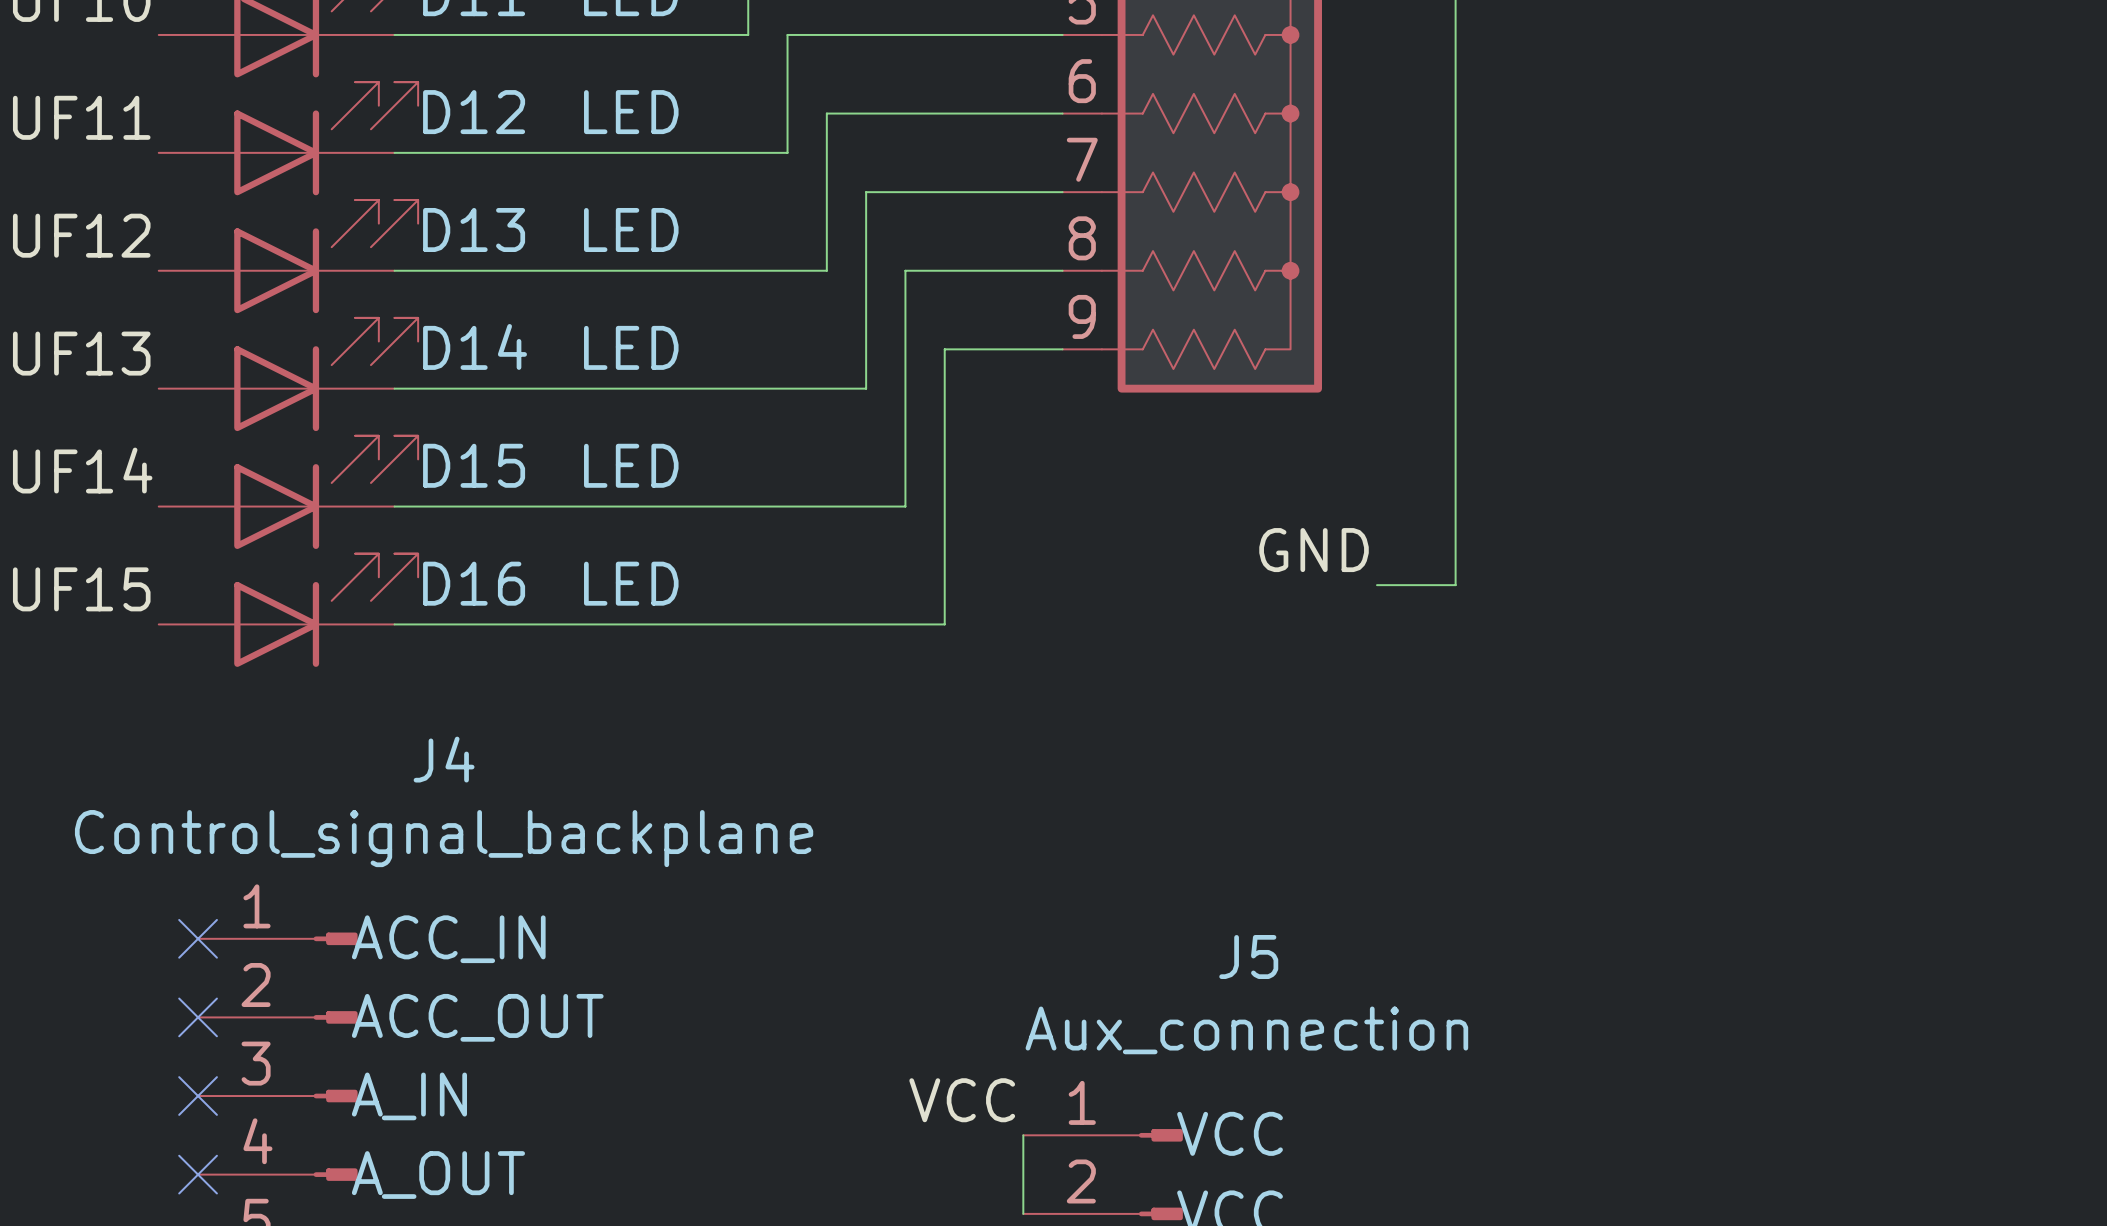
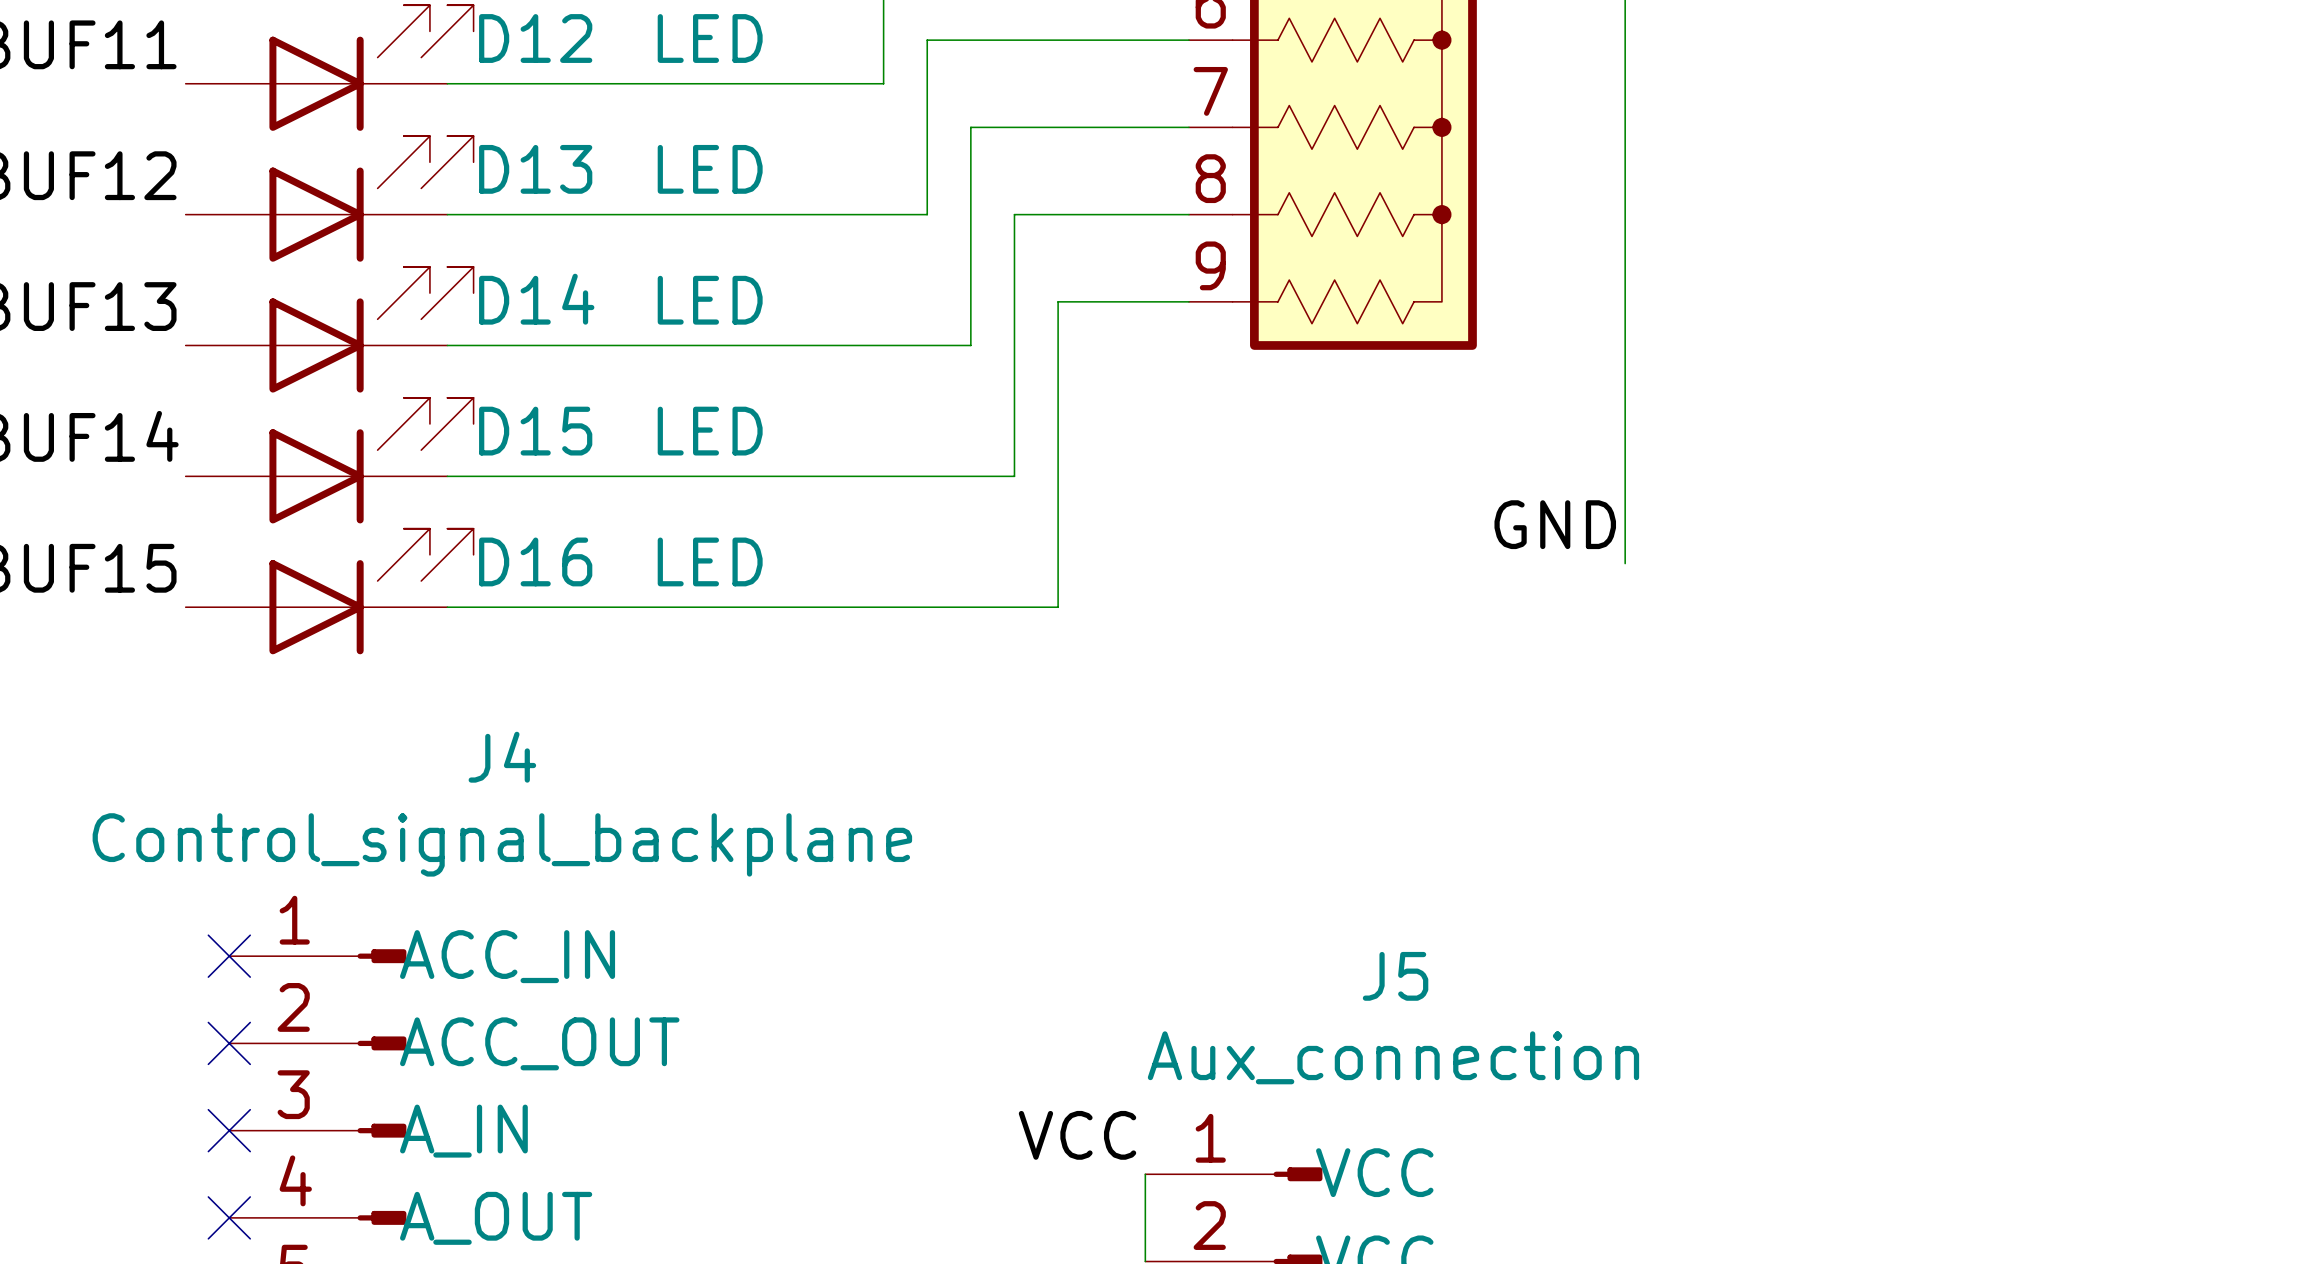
label position: GND (1314, 550) -> GND (1555, 524)
wire: (1377, 585) (1455, 585) -> none

